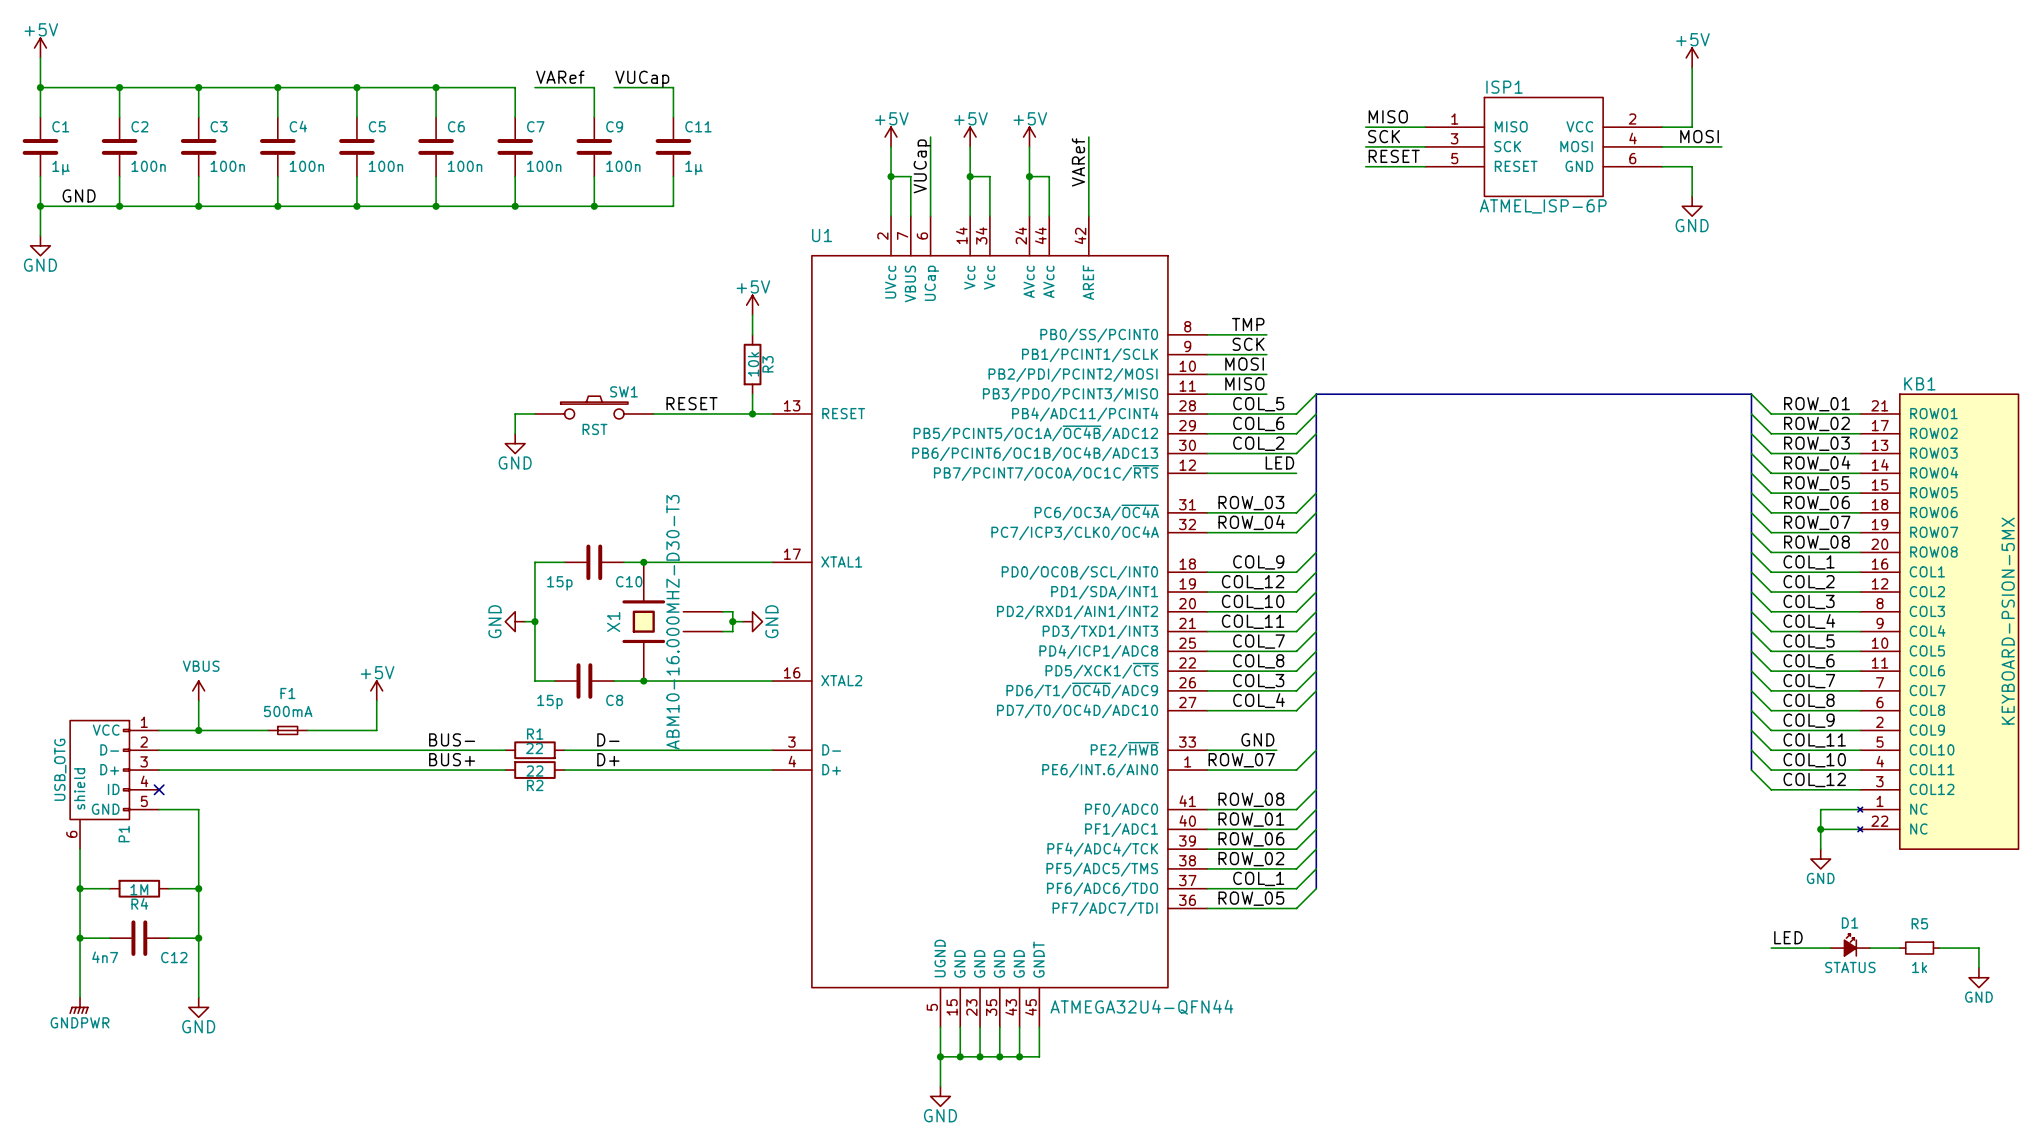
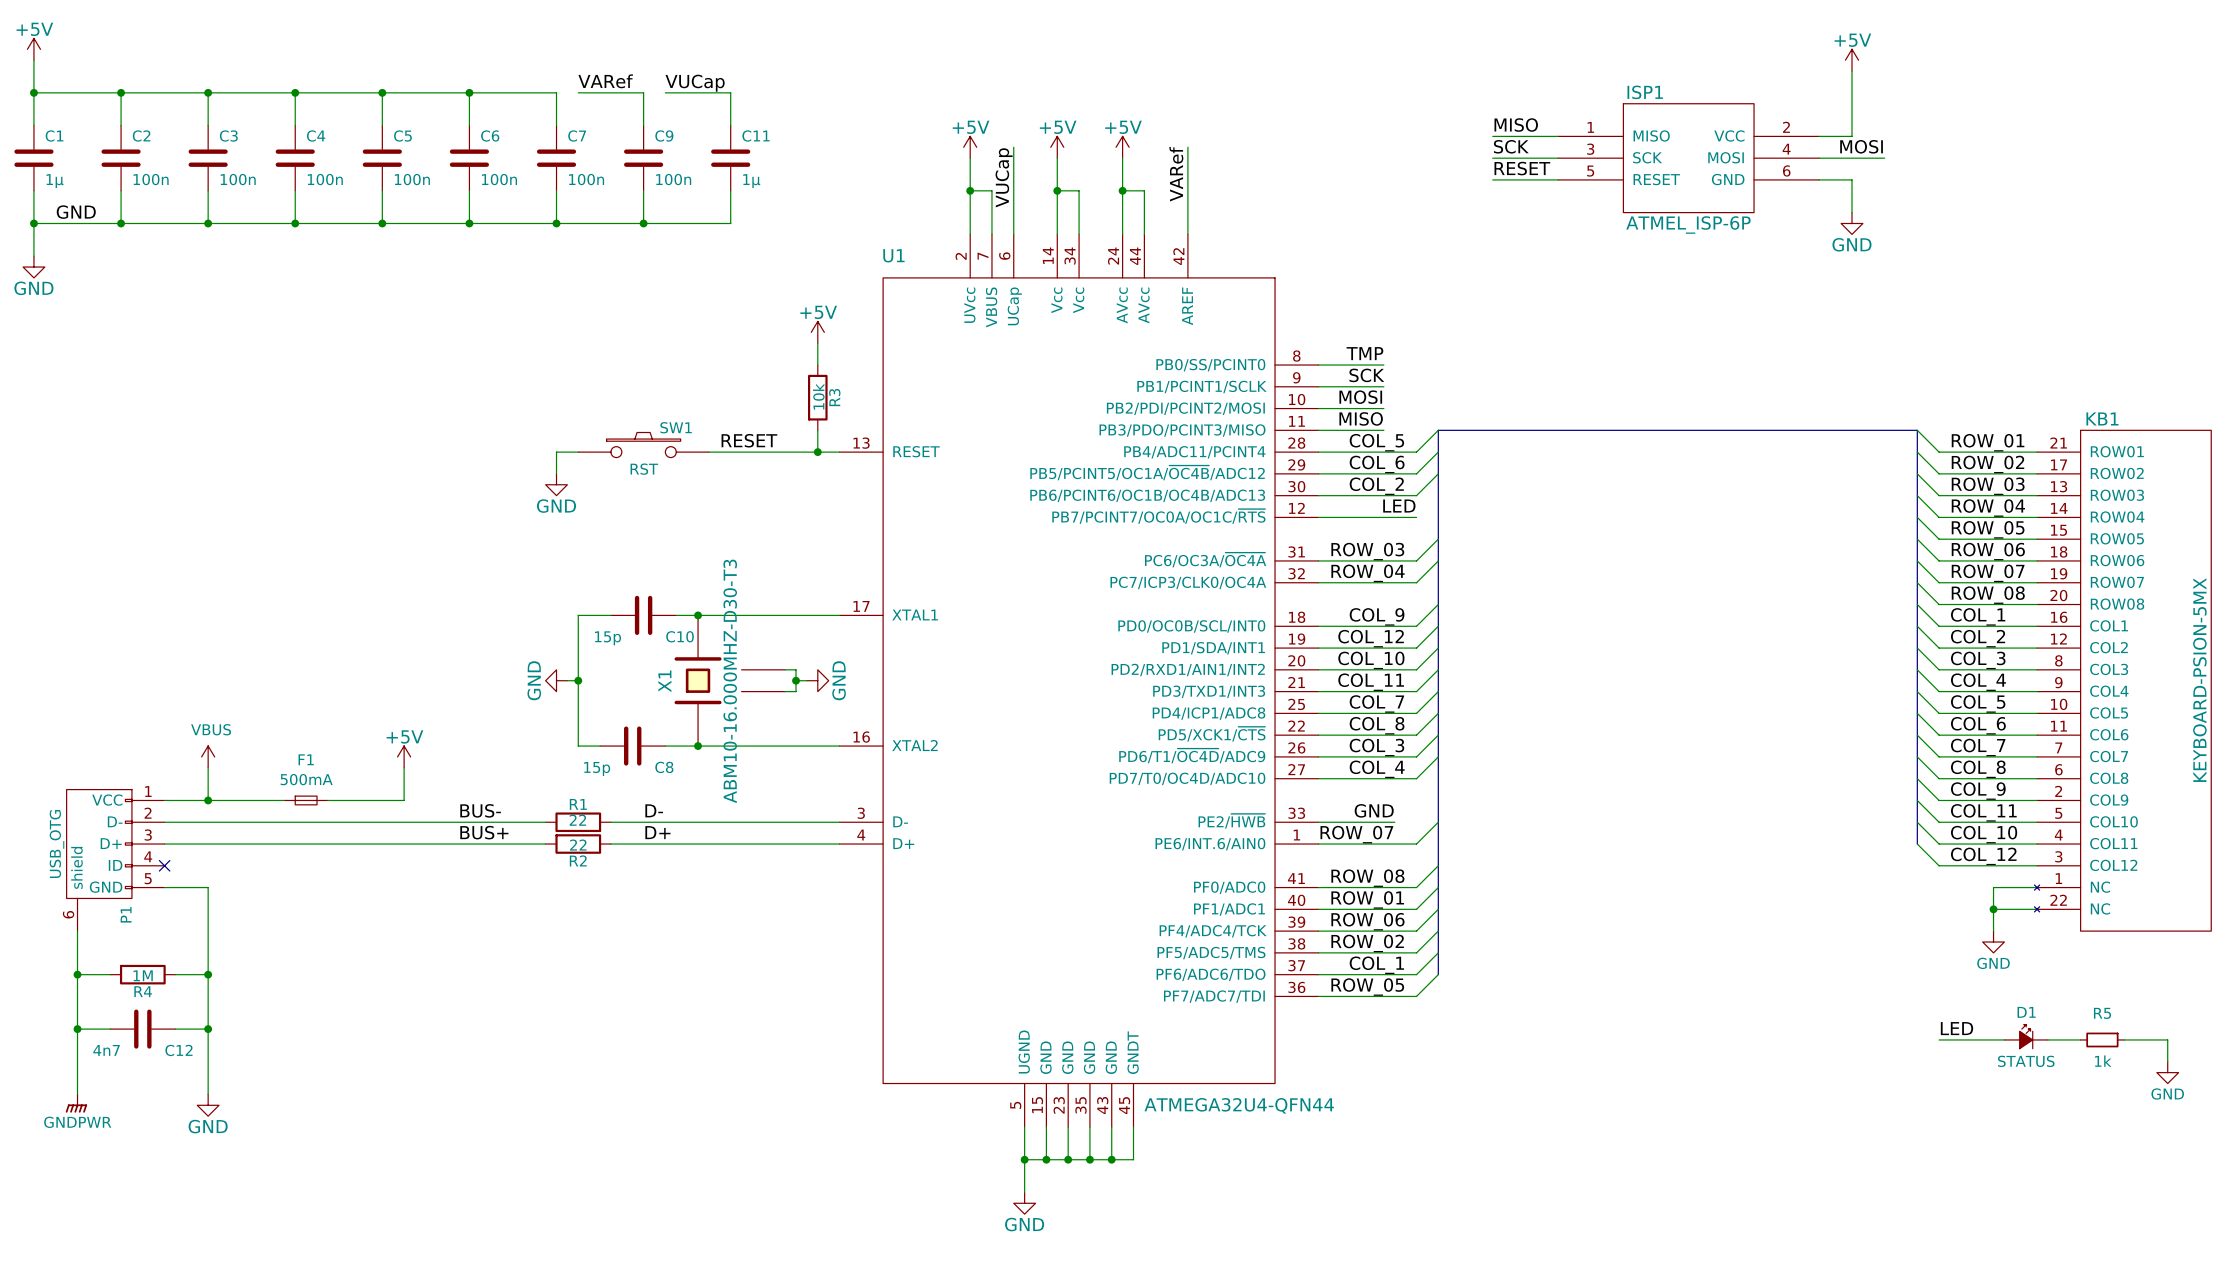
KB1 symbol: [1857, 394, 2019, 850] -> [2034, 430, 2212, 932]

